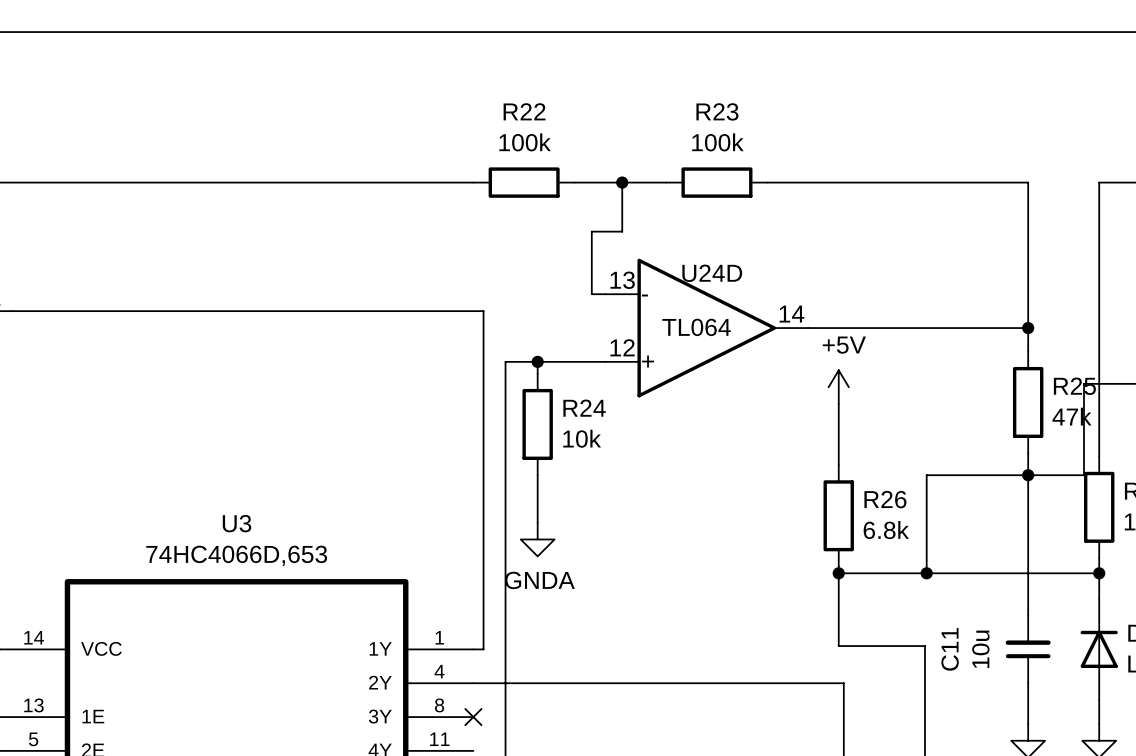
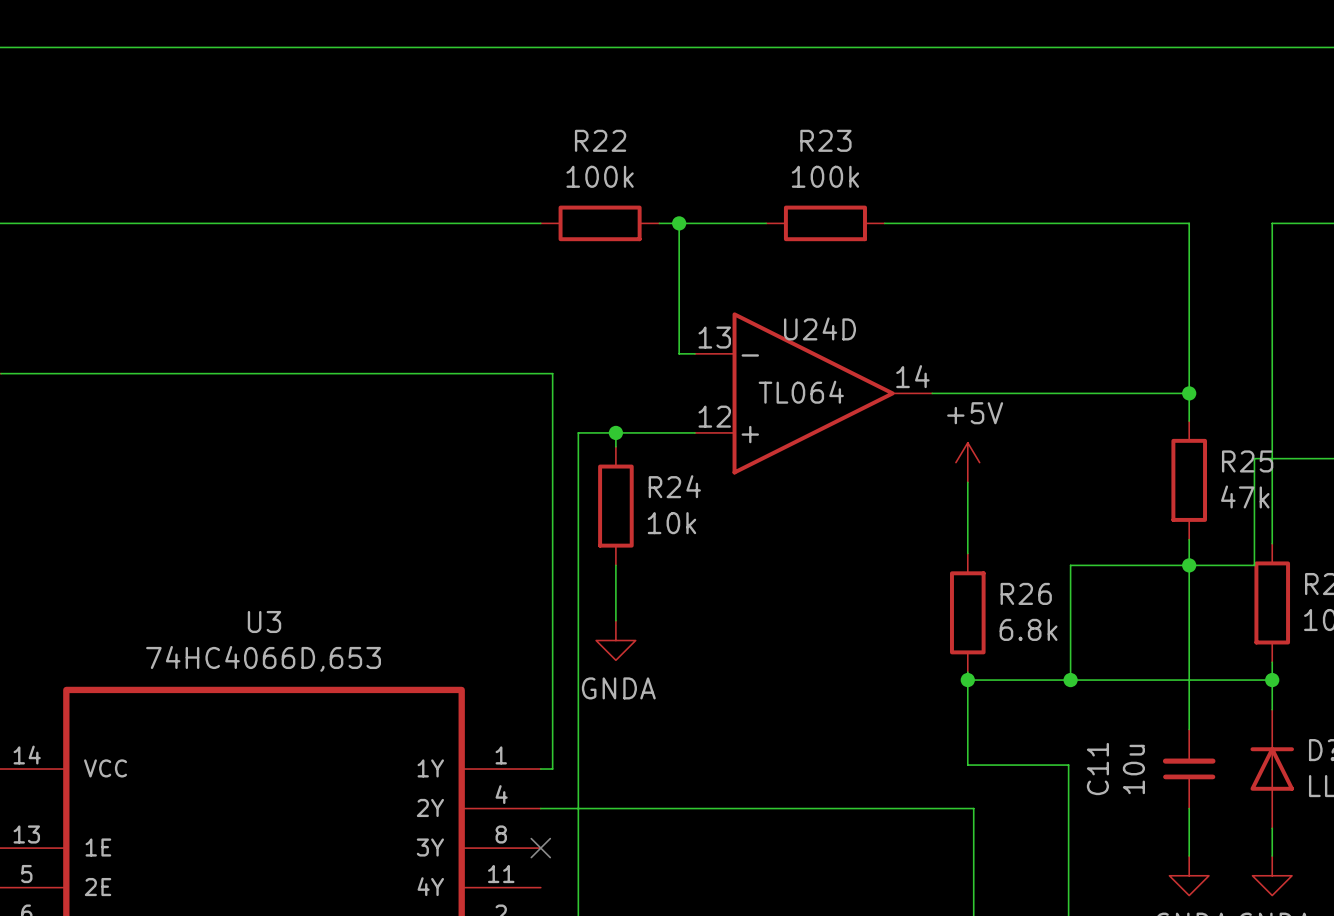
wire: (622, 182) (622, 231) (591, 231) -> (679, 223) (679, 280)
junction position: (622, 182) -> (679, 223)

